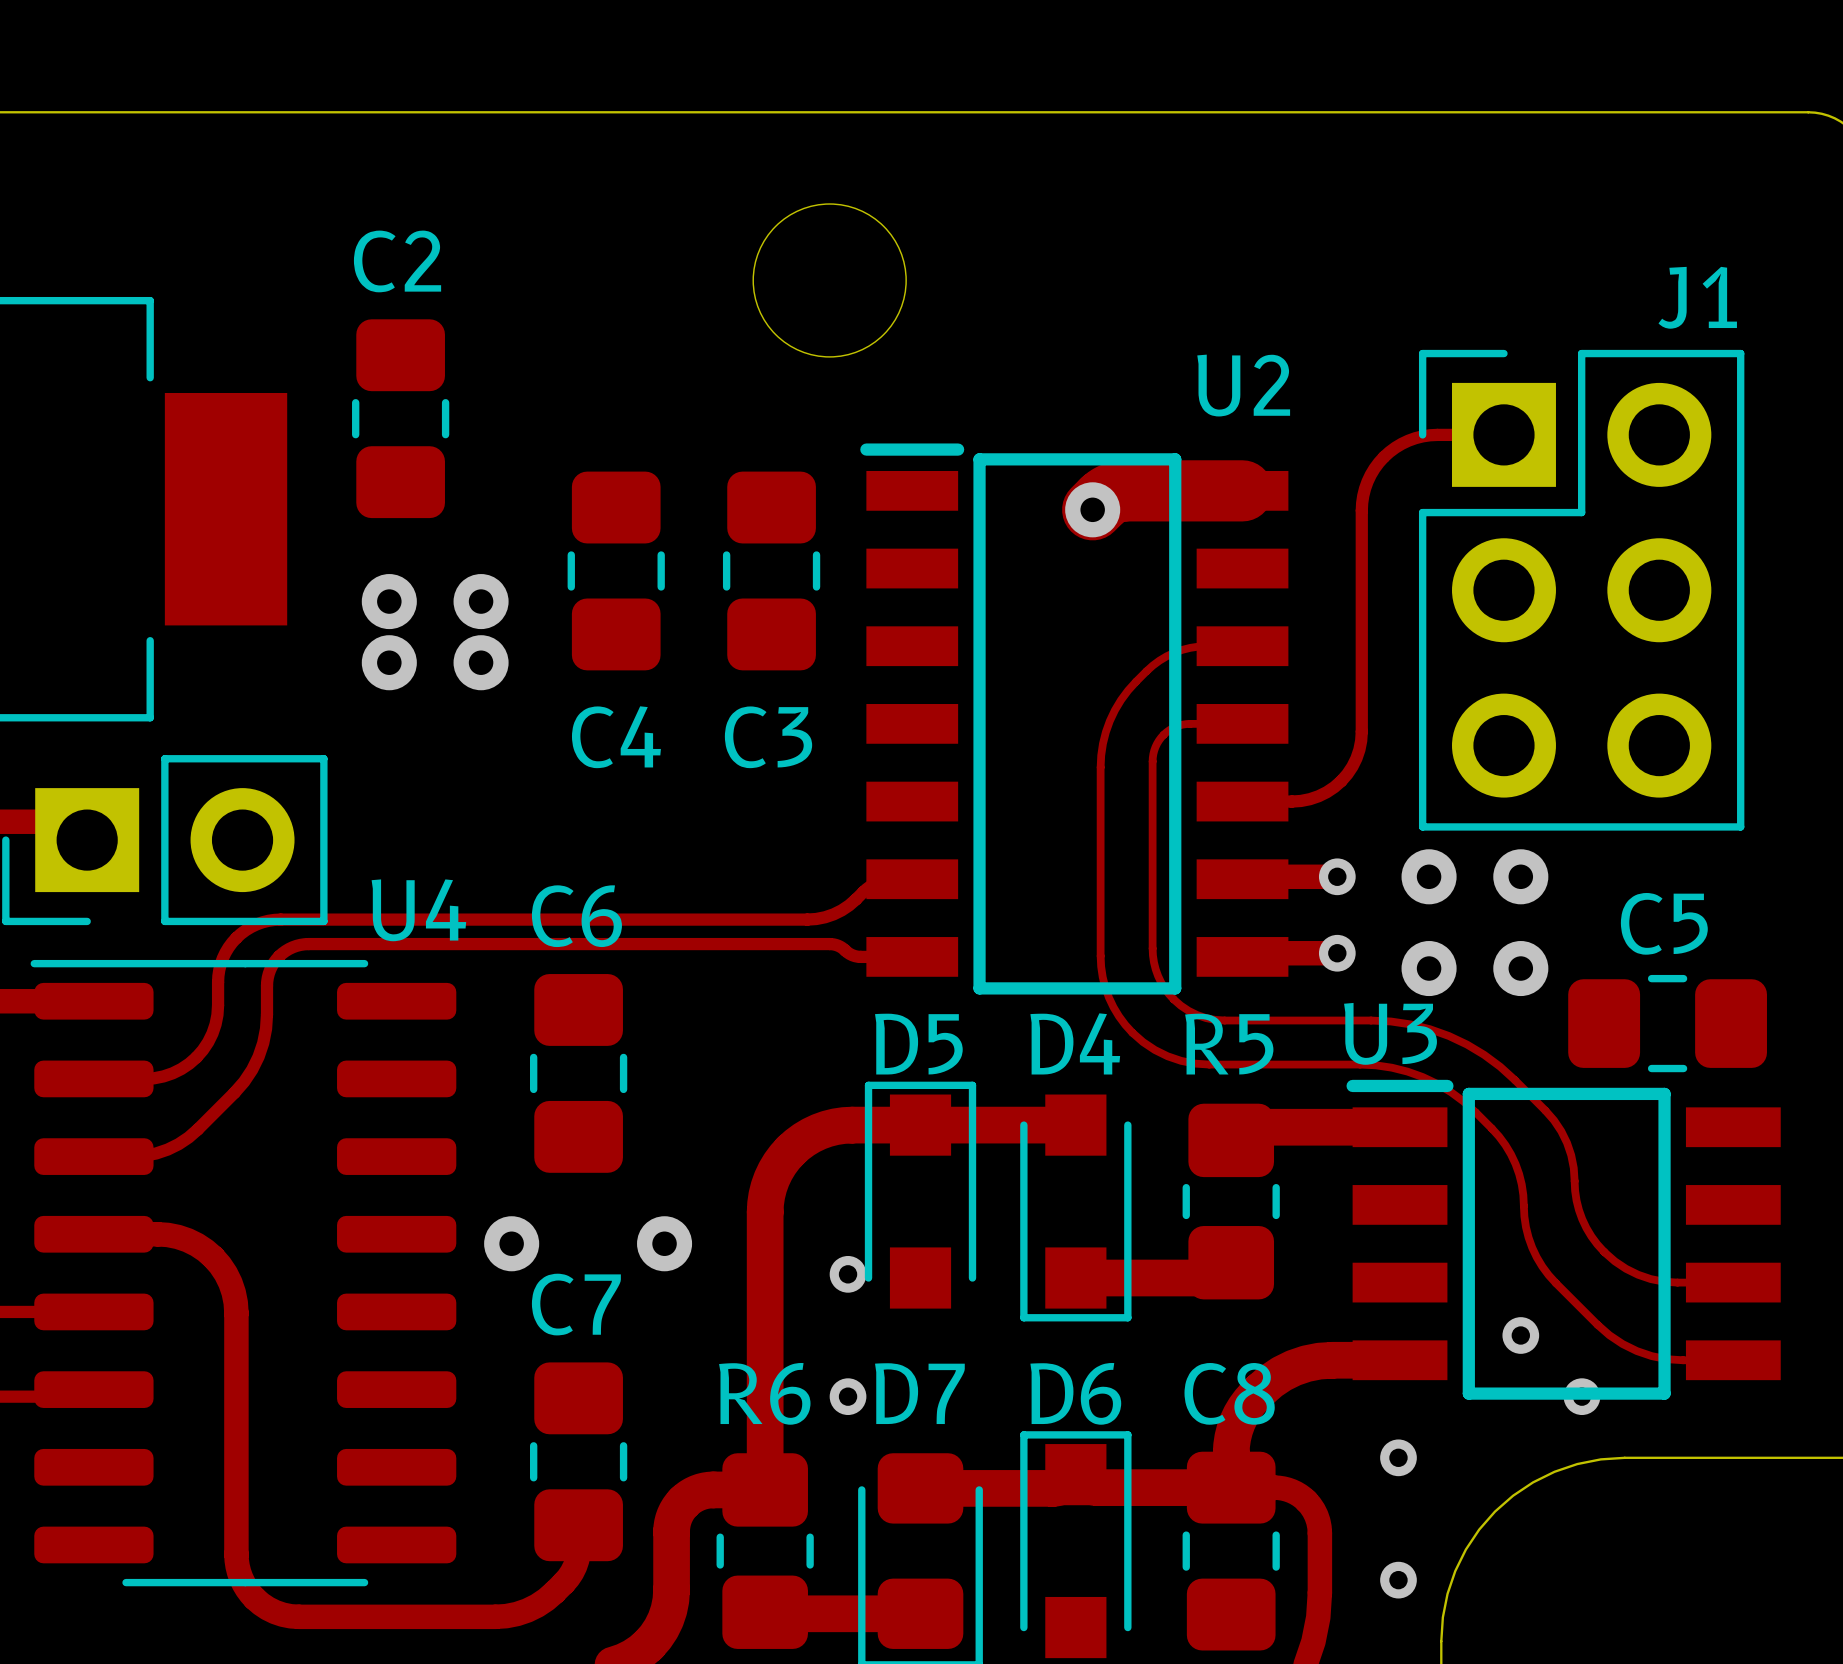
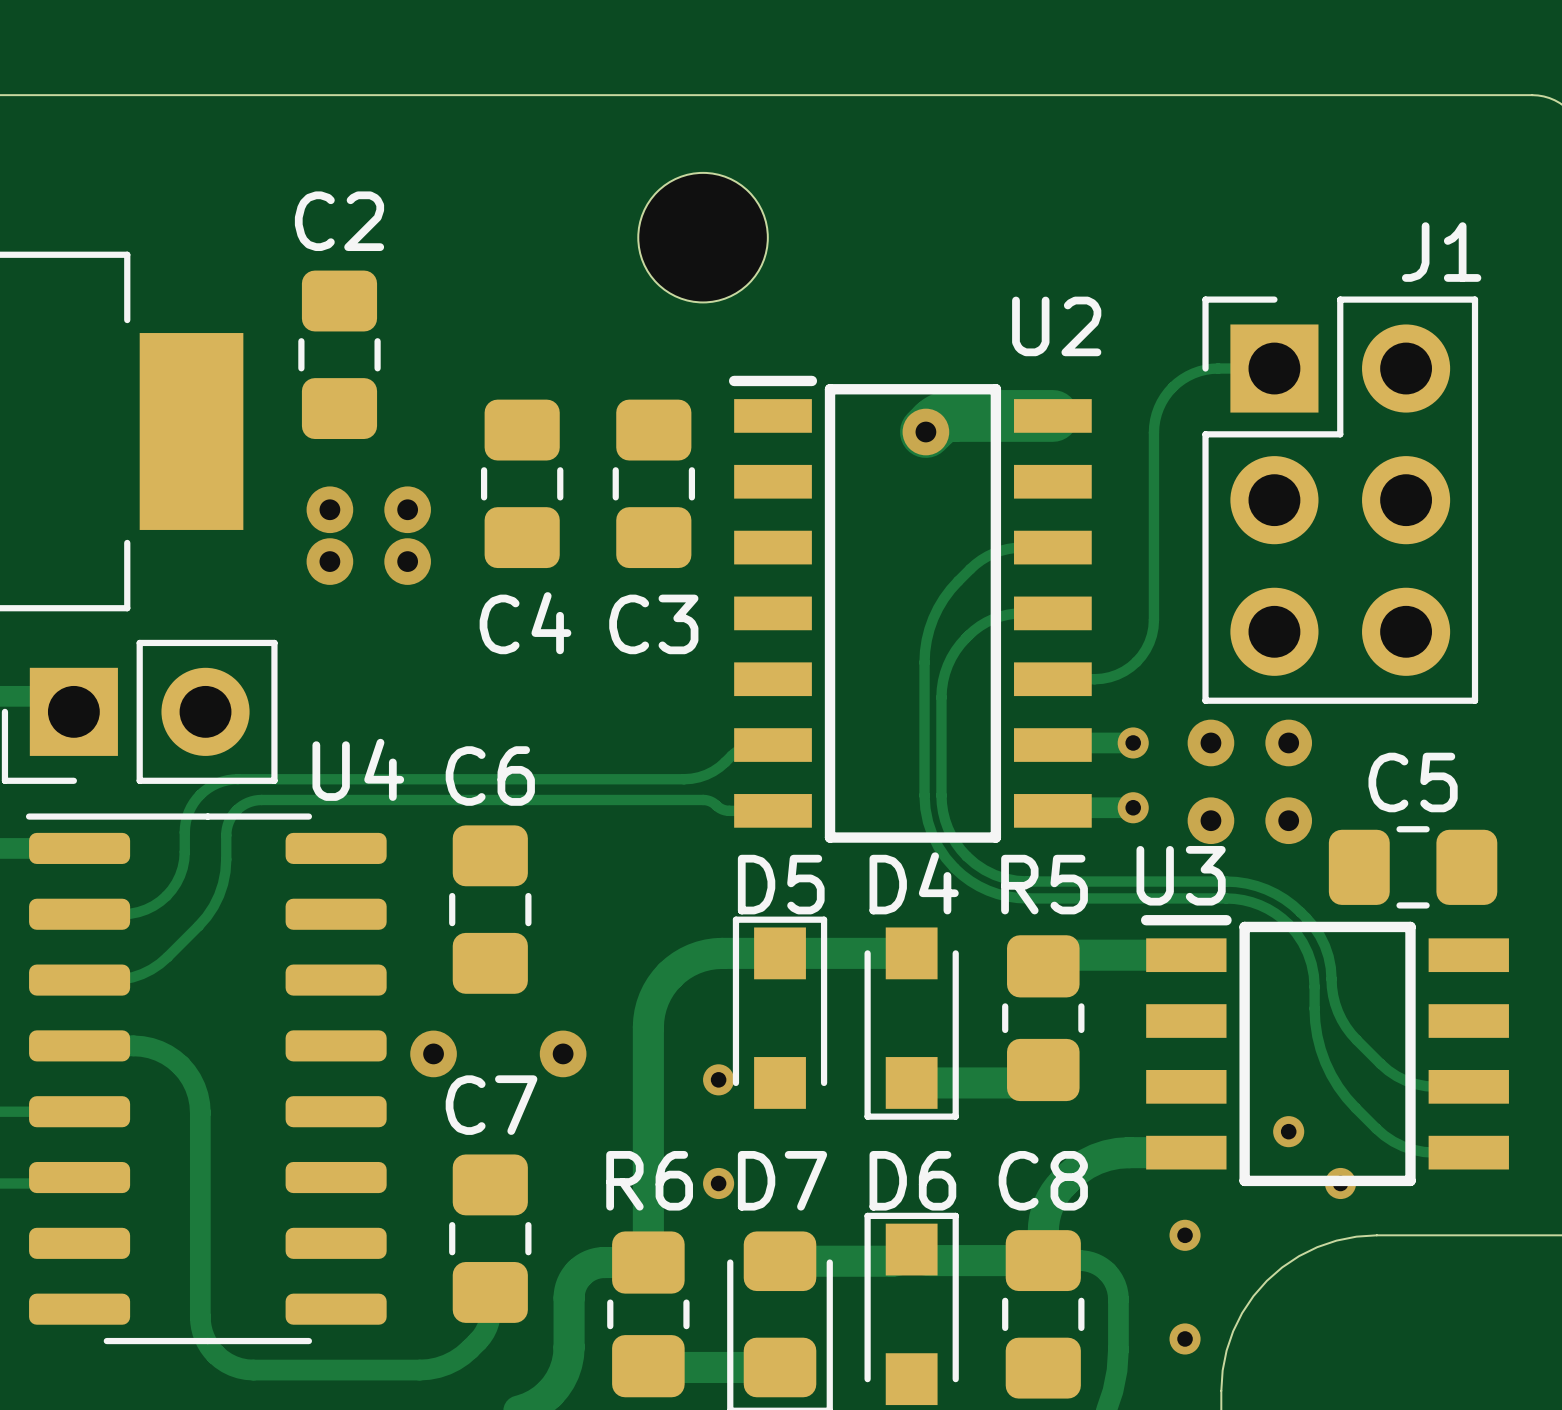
track: (1207, 646) (1190, 647) (1174, 652) (1159, 660) (1146, 671) (1121, 700) (1109, 720) (1102, 743) (1100, 767) (1101, 966) (1108, 997) (1118, 1016) (1143, 1042) (1154, 1050) (1181, 1060) (1209, 1064) (1376, 1065) (1407, 1071) (1437, 1083) (1463, 1101) (1475, 1112) (1499, 1136) (1510, 1154) (1521, 1184) (1528, 1237) (1536, 1257) (1555, 1283) (1597, 1324) (1622, 1344) (1651, 1356) (1667, 1359) (1692, 1360) -> (1022, 547) (994, 553) (970, 569) (943, 598) (933, 618) (926, 640) (924, 662) (925, 808) (932, 834) (945, 858) (970, 881) (988, 890) (1007, 896) (1027, 898) (1234, 898) (1259, 905) (1275, 913) (1296, 933) (1307, 953) (1313, 975) (1317, 1036) (1325, 1062) (1338, 1086) (1355, 1108) (1384, 1135) (1402, 1146) (1434, 1152)
track: (1205, 723) (1182, 724) (1169, 730) (1157, 743) (1152, 757) (1152, 955) (1158, 976) (1168, 994) (1188, 1010) (1215, 1019) (1390, 1021) (1430, 1029) (1467, 1044) (1484, 1054) (1515, 1080) (1545, 1110) (1561, 1131) (1571, 1155) (1578, 1210) (1586, 1228) (1603, 1251) (1614, 1261) (1638, 1274) (1664, 1281) (1694, 1282) -> (1021, 613) (999, 616) (974, 630) (955, 650) (945, 673) (941, 697) (941, 803) (948, 828) (961, 850) (984, 869) (1016, 880) (1236, 882) (1256, 886) (1275, 893) (1300, 912) (1319, 935) (1328, 956) (1335, 1004) (1341, 1019) (1351, 1033) (1380, 1063) (1396, 1076) (1415, 1084) (1436, 1086)

